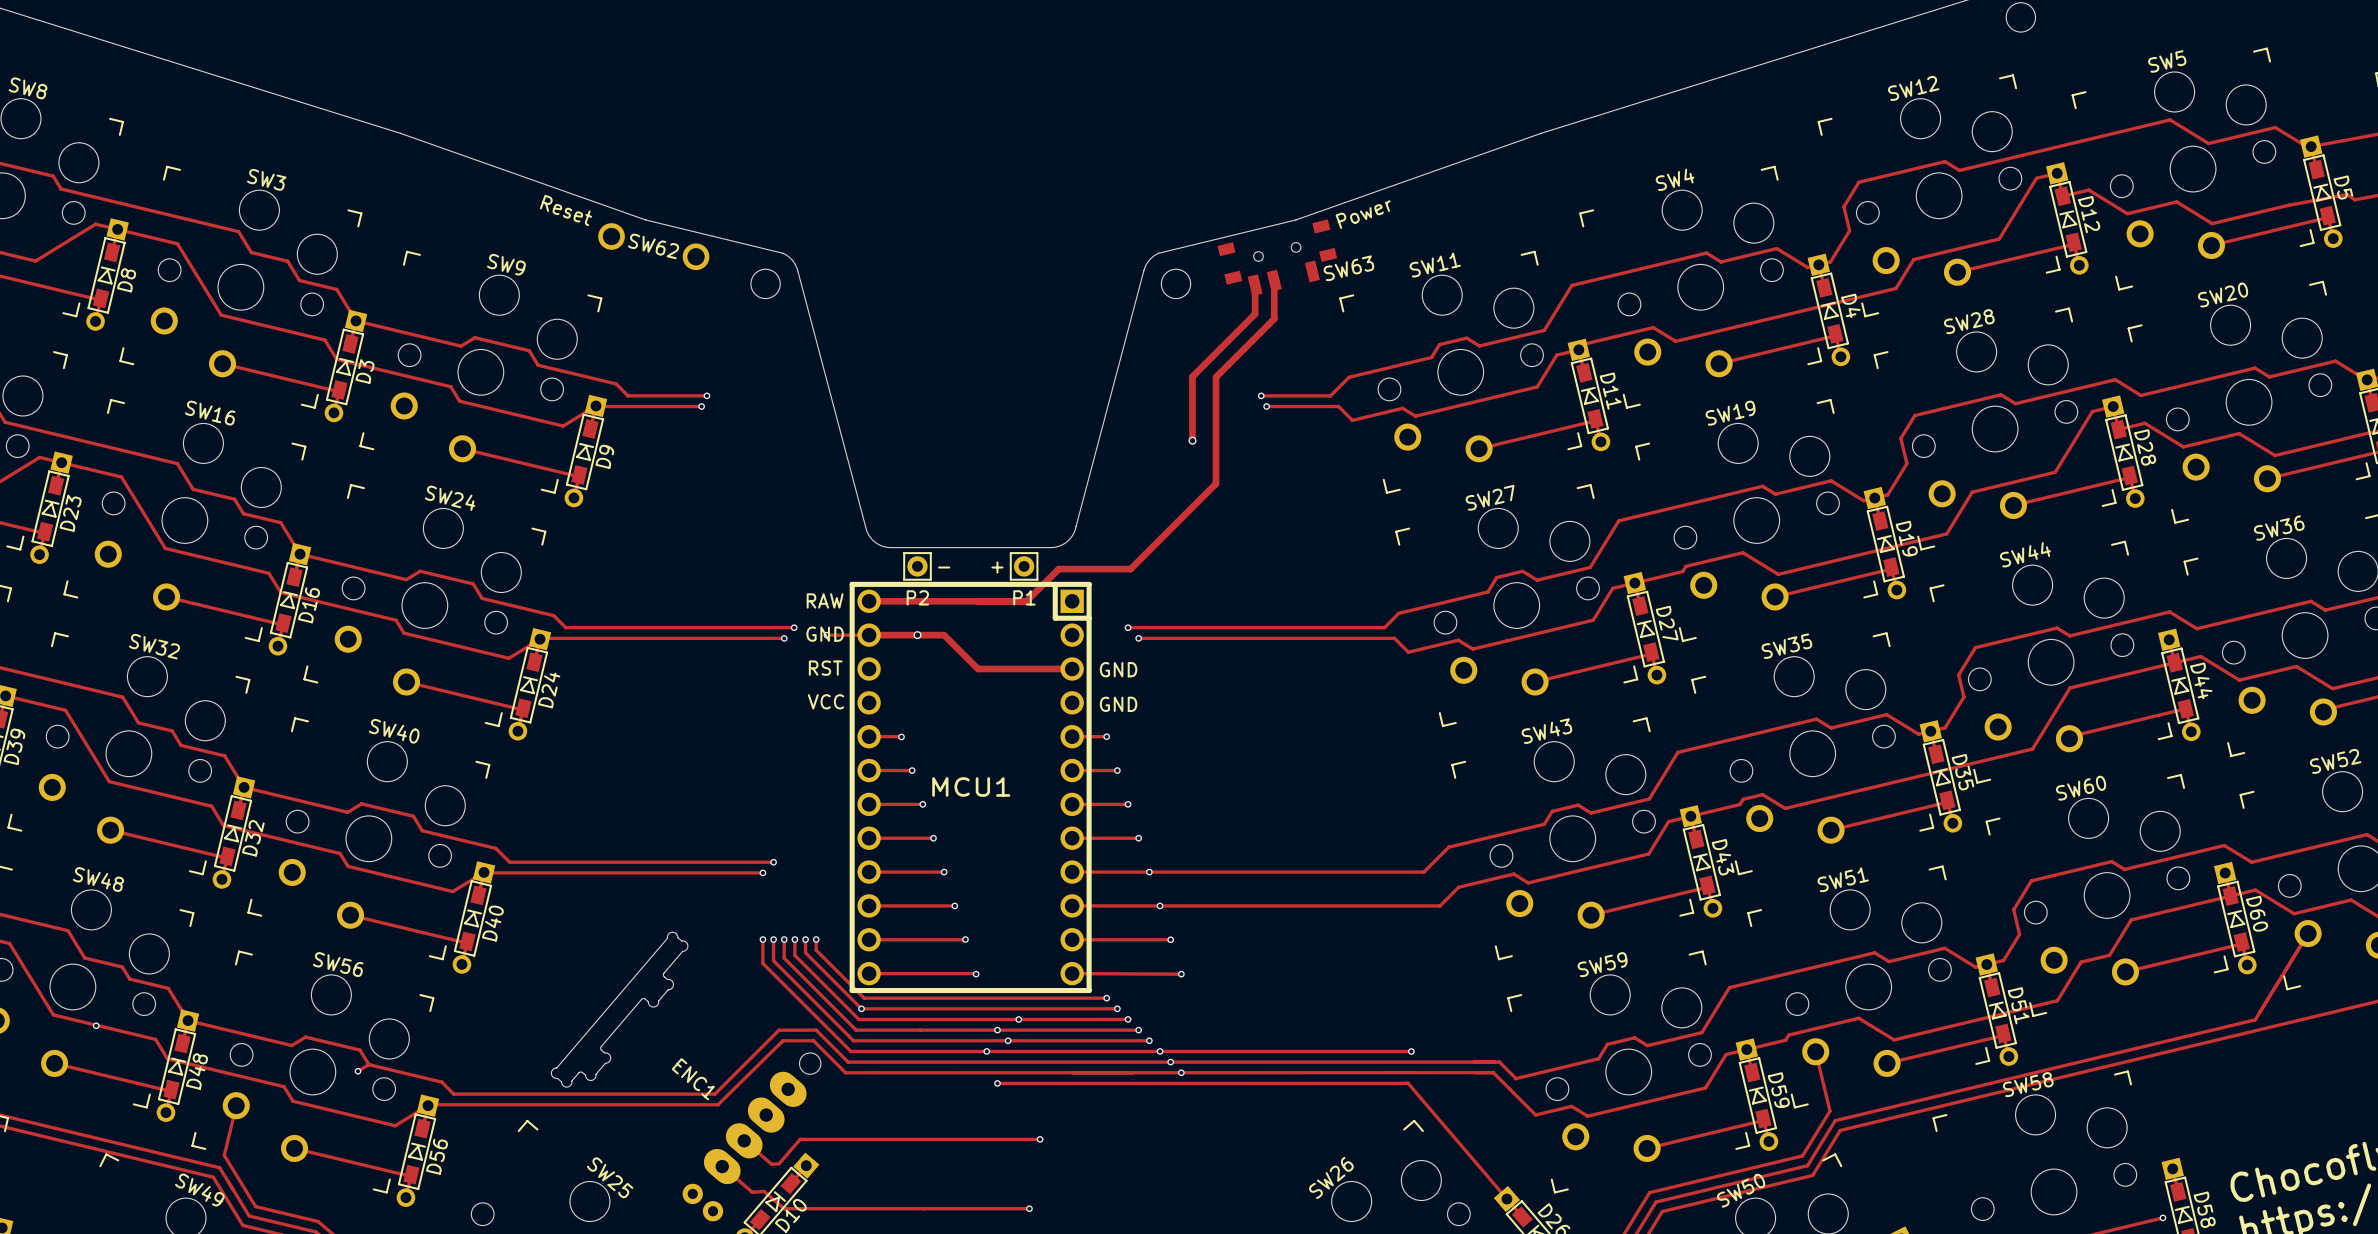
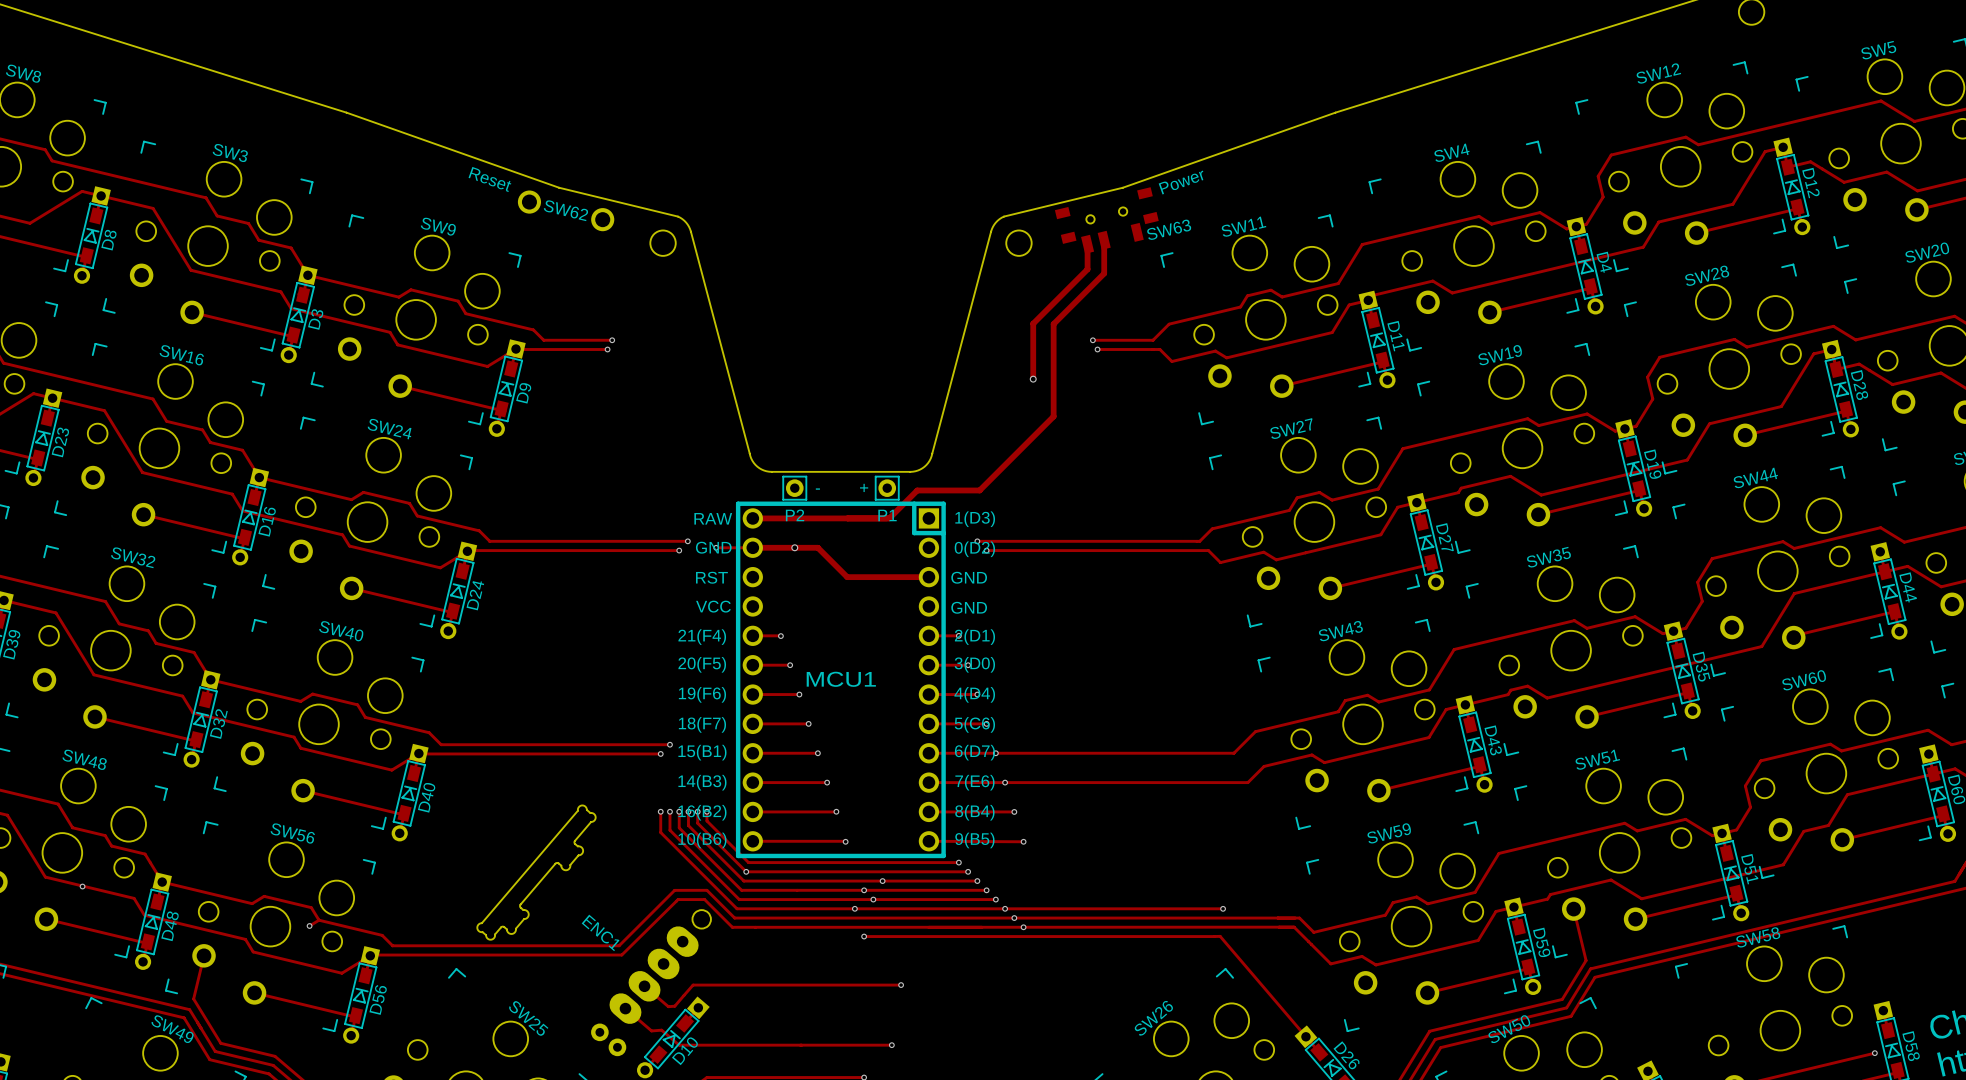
MCU1 footprint: [849, 581, 1092, 994] -> [735, 501, 946, 859]

